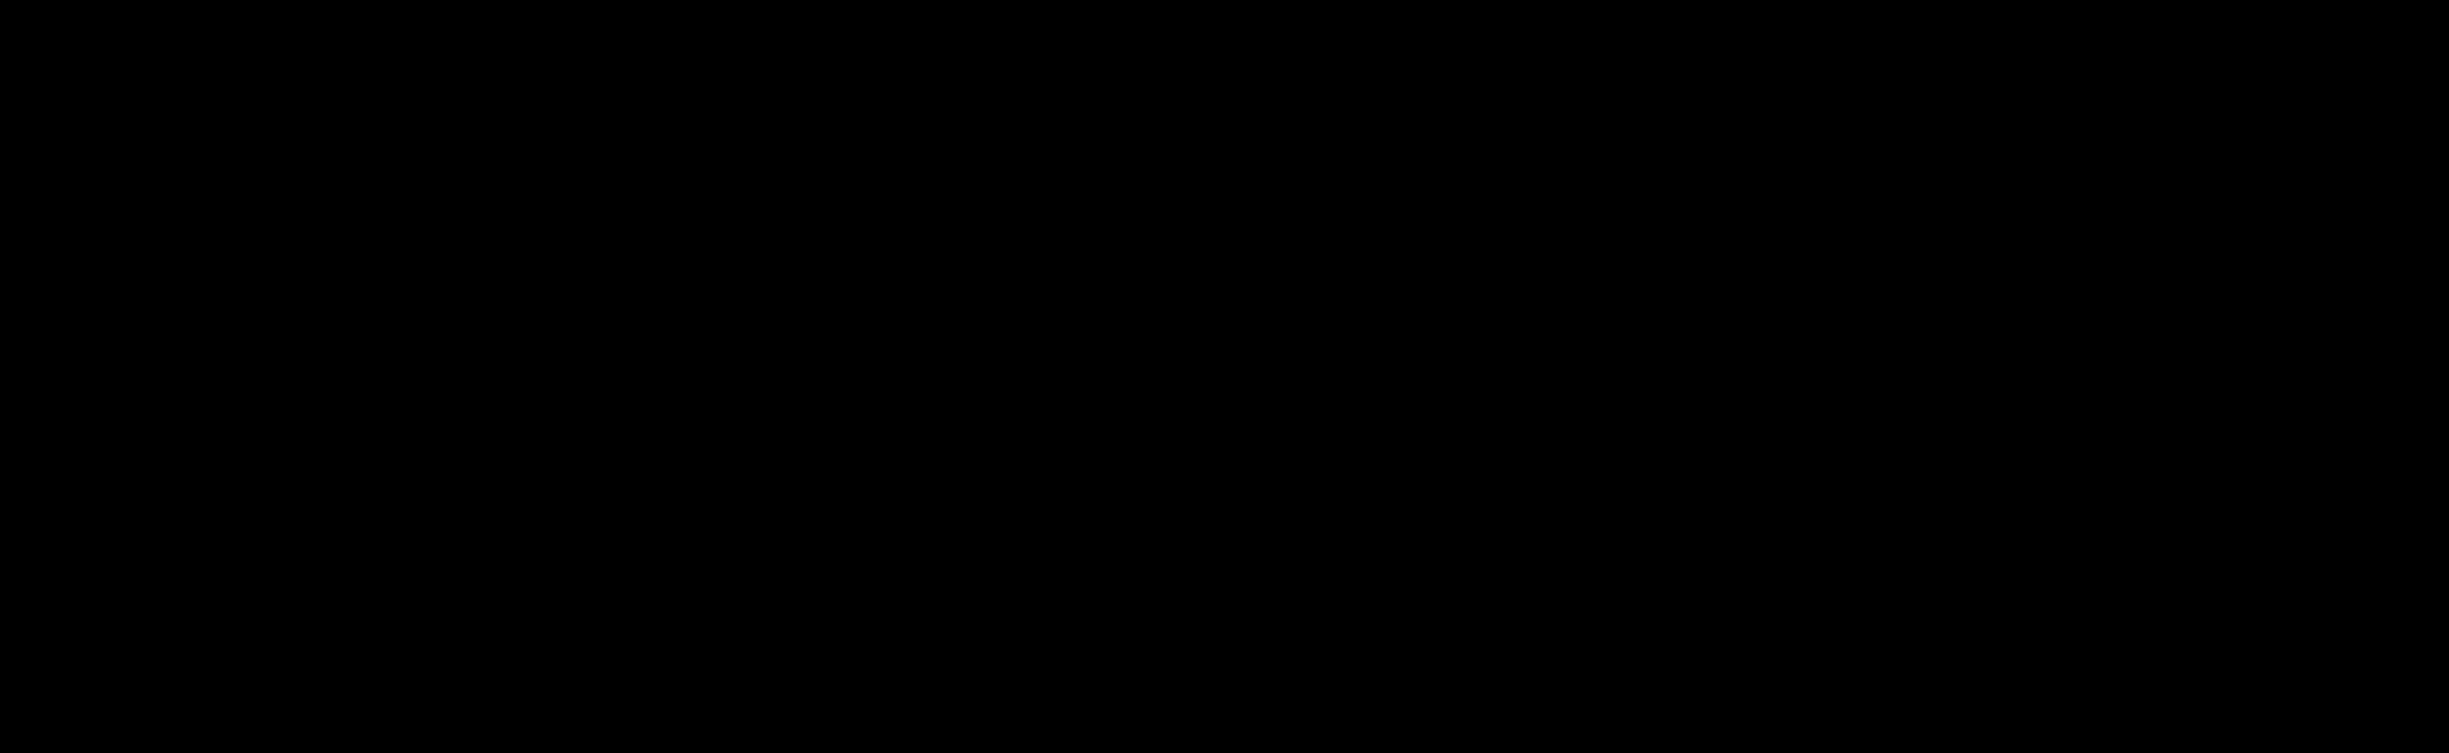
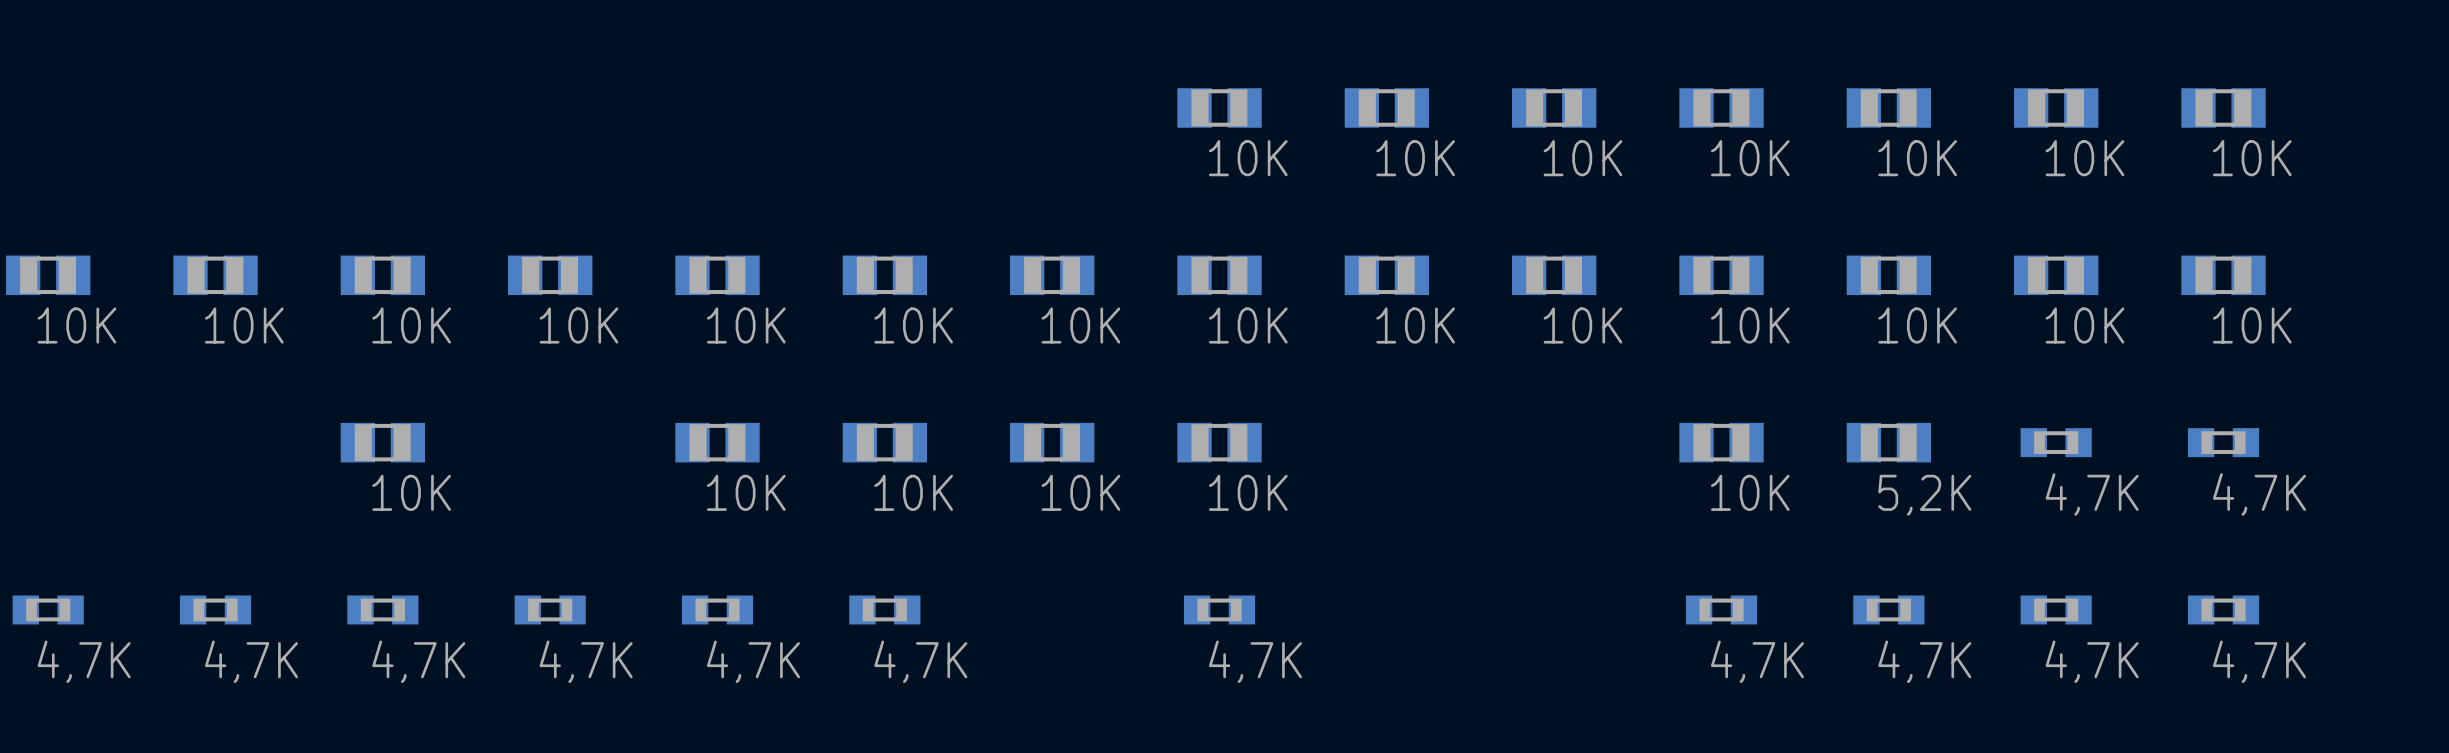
part: none -> 10K (1219, 107)
part: none -> 10K (1386, 107)
part: none -> 10K (1554, 107)
part: none -> 10K (1721, 107)
part: none -> 10K (1888, 107)
part: none -> 10K (2056, 107)
part: none -> 10K (2223, 107)
part: none -> 10K (48, 275)
part: none -> 10K (215, 275)
part: none -> 10K (382, 275)
part: none -> 10K (550, 275)
part: none -> 10K (717, 275)
part: none -> 10K (884, 275)
part: none -> 10K (1052, 275)
part: none -> 10K (1219, 275)
part: none -> 10K (1386, 275)
part: none -> 10K (1554, 275)
part: none -> 10K (1721, 275)
part: none -> 10K (1888, 275)
part: none -> 10K (2056, 275)
part: none -> 10K (2223, 275)
part: none -> 10K (382, 442)
part: none -> 10K (717, 442)
part: none -> 10K (884, 442)
part: none -> 10K (1052, 442)
part: none -> 10K (1219, 442)
part: none -> 10K (1721, 442)
part: none -> 5,2K (1888, 442)
part: none -> 4,7K (2056, 442)
part: none -> 4,7K (2223, 442)
part: none -> 4,7K (48, 609)
part: none -> 4,7K (215, 609)
part: none -> 4,7K (382, 609)
part: none -> 4,7K (550, 609)
part: none -> 4,7K (717, 609)
part: none -> 4,7K (884, 609)
part: none -> 4,7K (1219, 609)
part: none -> 4,7K (1721, 609)
part: none -> 4,7K (1888, 609)
part: none -> 4,7K (2056, 609)
part: none -> 4,7K (2223, 609)

